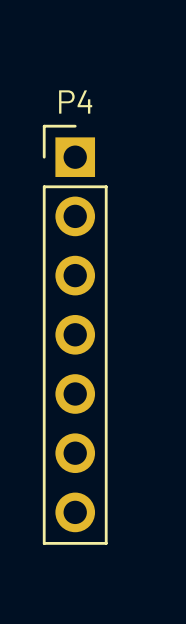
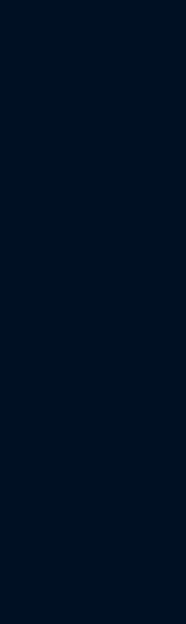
P4: (75, 334) -> none

